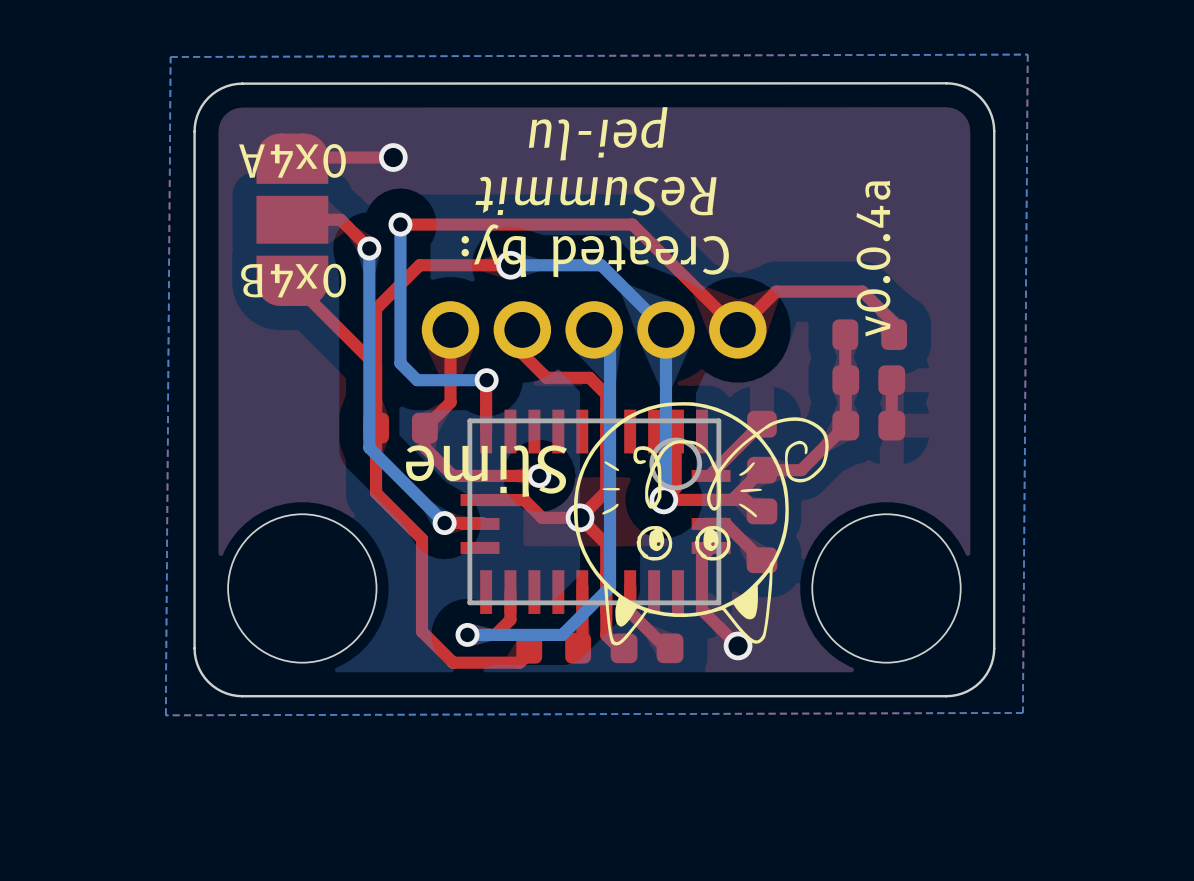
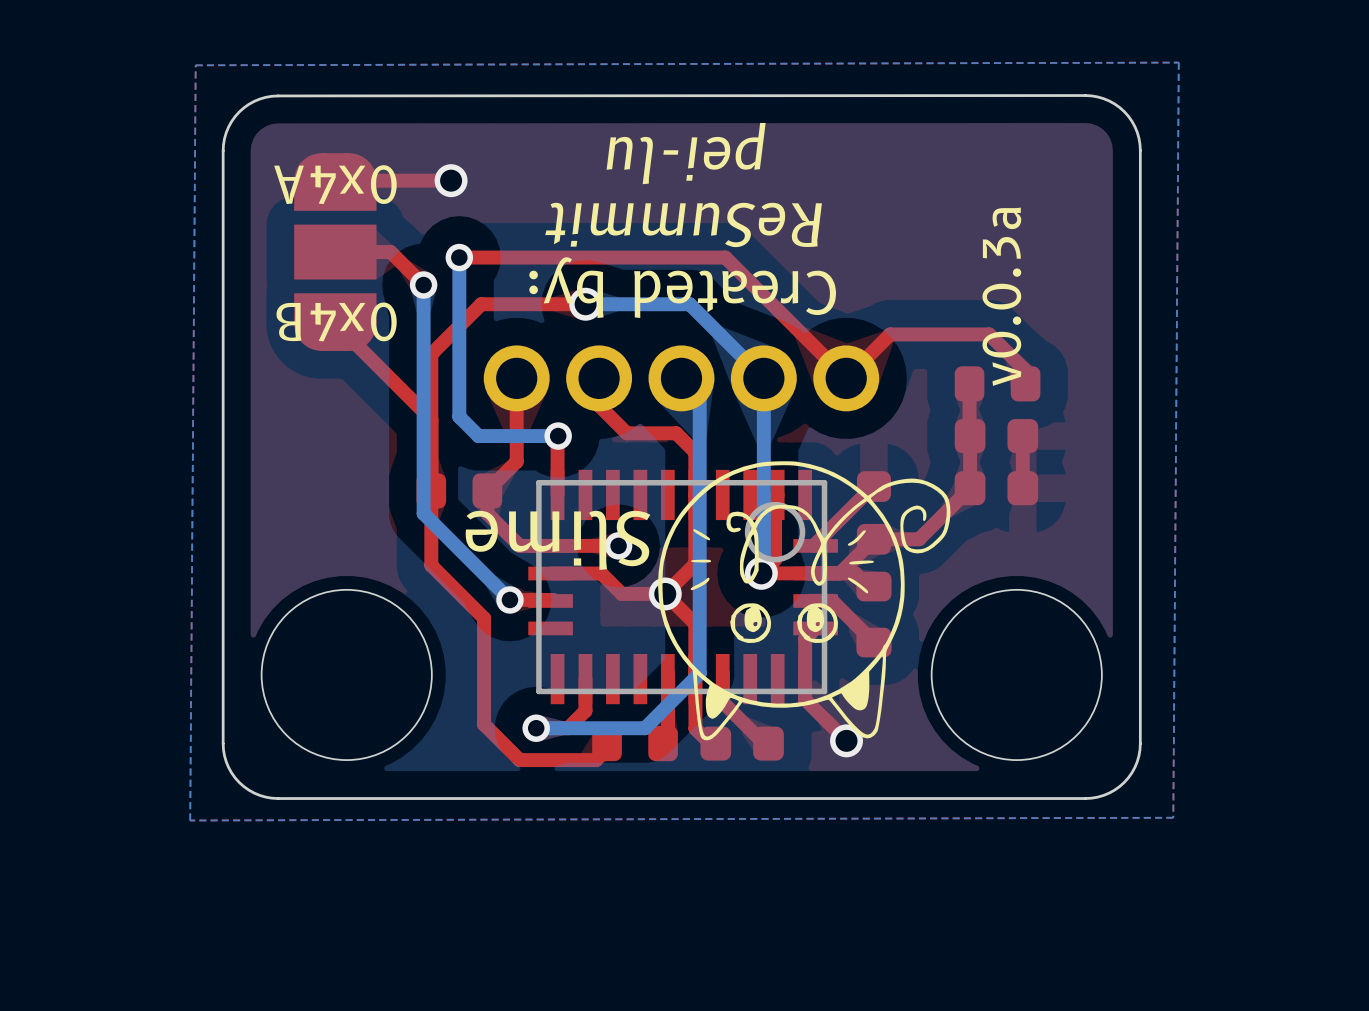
text: v0.0.4a (873, 258) -> v0.0.3a (1001, 296)

